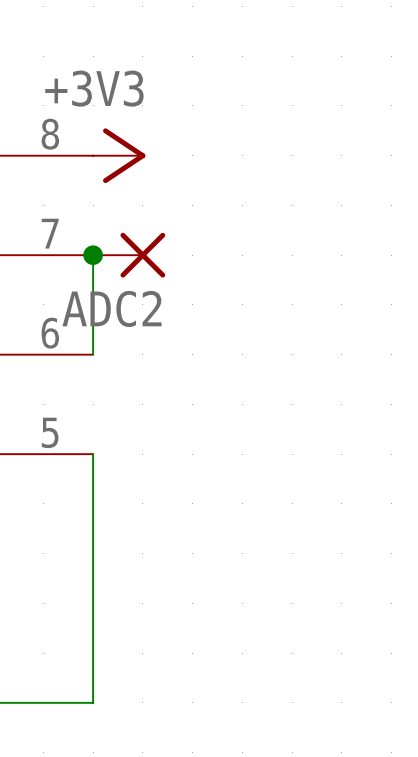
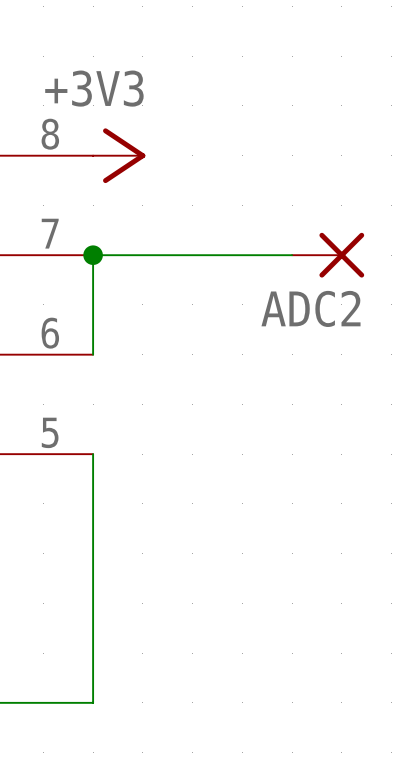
wire: none -> (93, 255) (292, 255)
ADC2 position: (129, 255) -> (328, 255)

